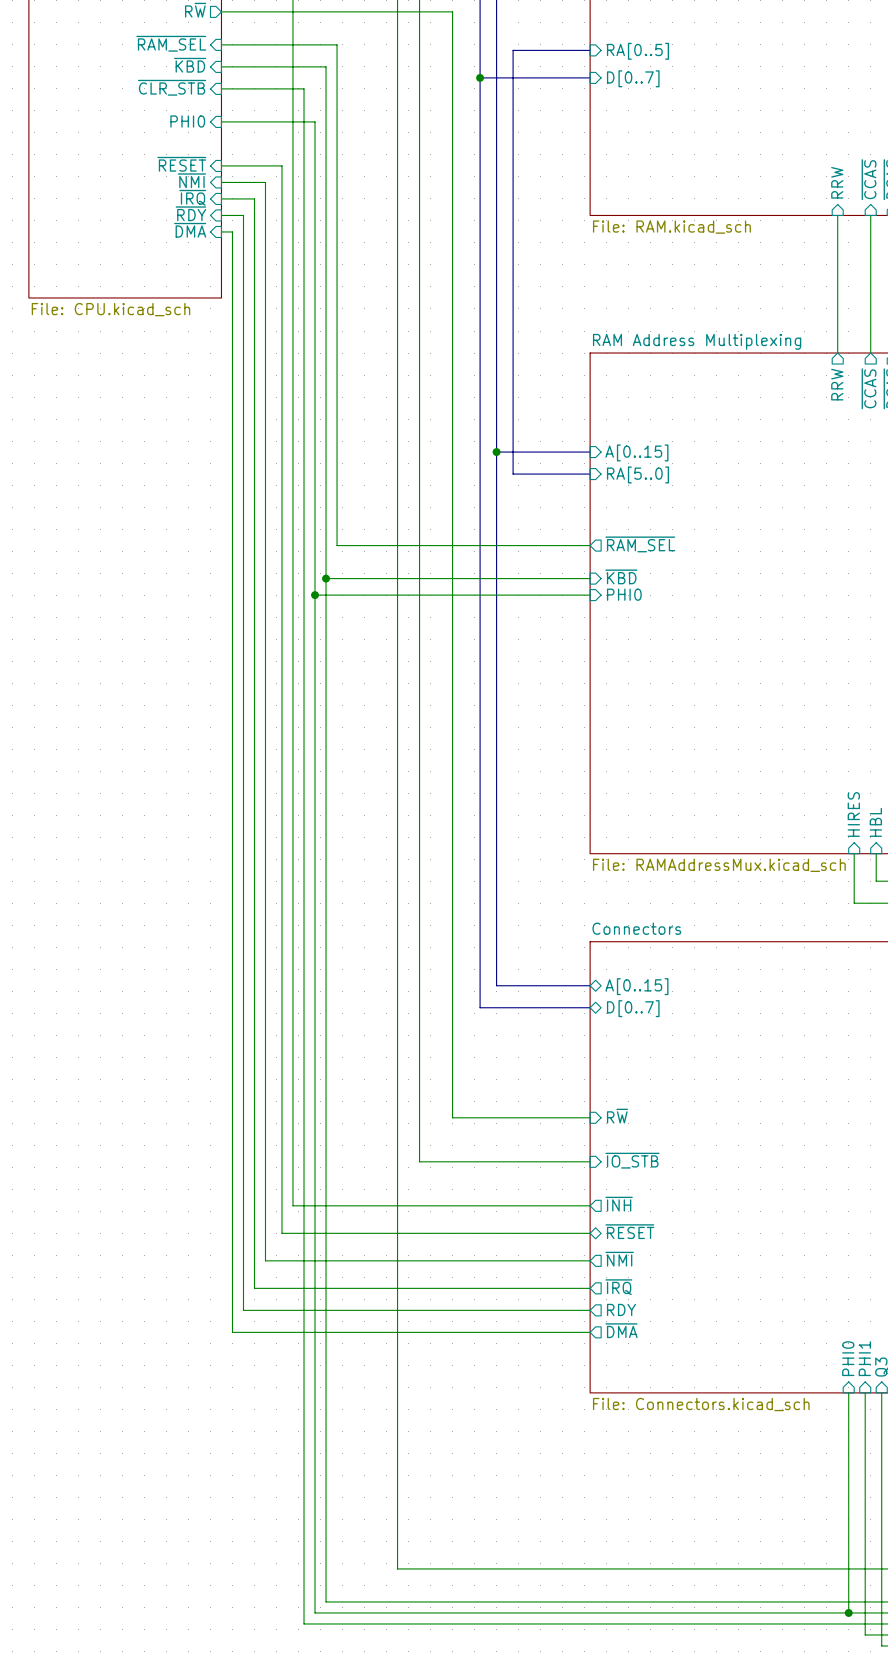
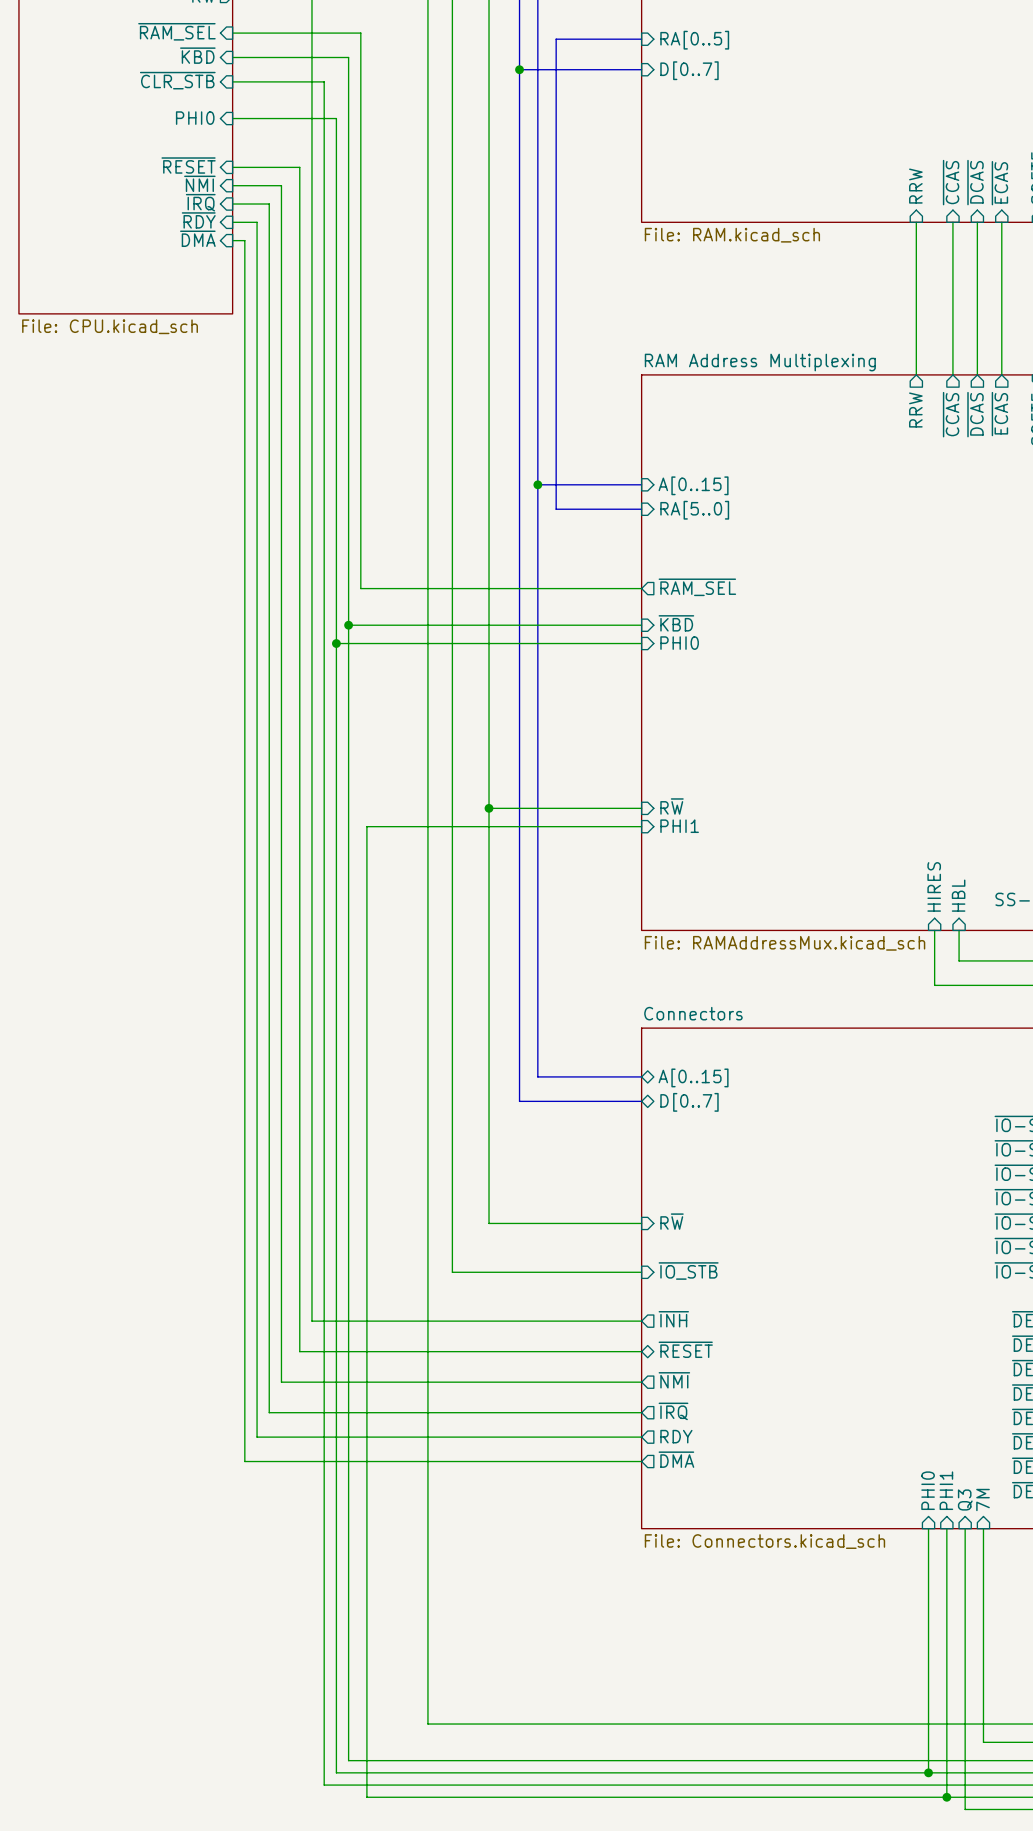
sheet pin: none -> R~{W} (672, 806)
wire: none -> (489, 808) (641, 808)
junction: none -> (489, 808)
sheet pin: none -> PHI1 (679, 826)
wire: none -> (641, 826) (366, 826) (366, 1797) (946, 1797)
junction: none -> (946, 1797)

